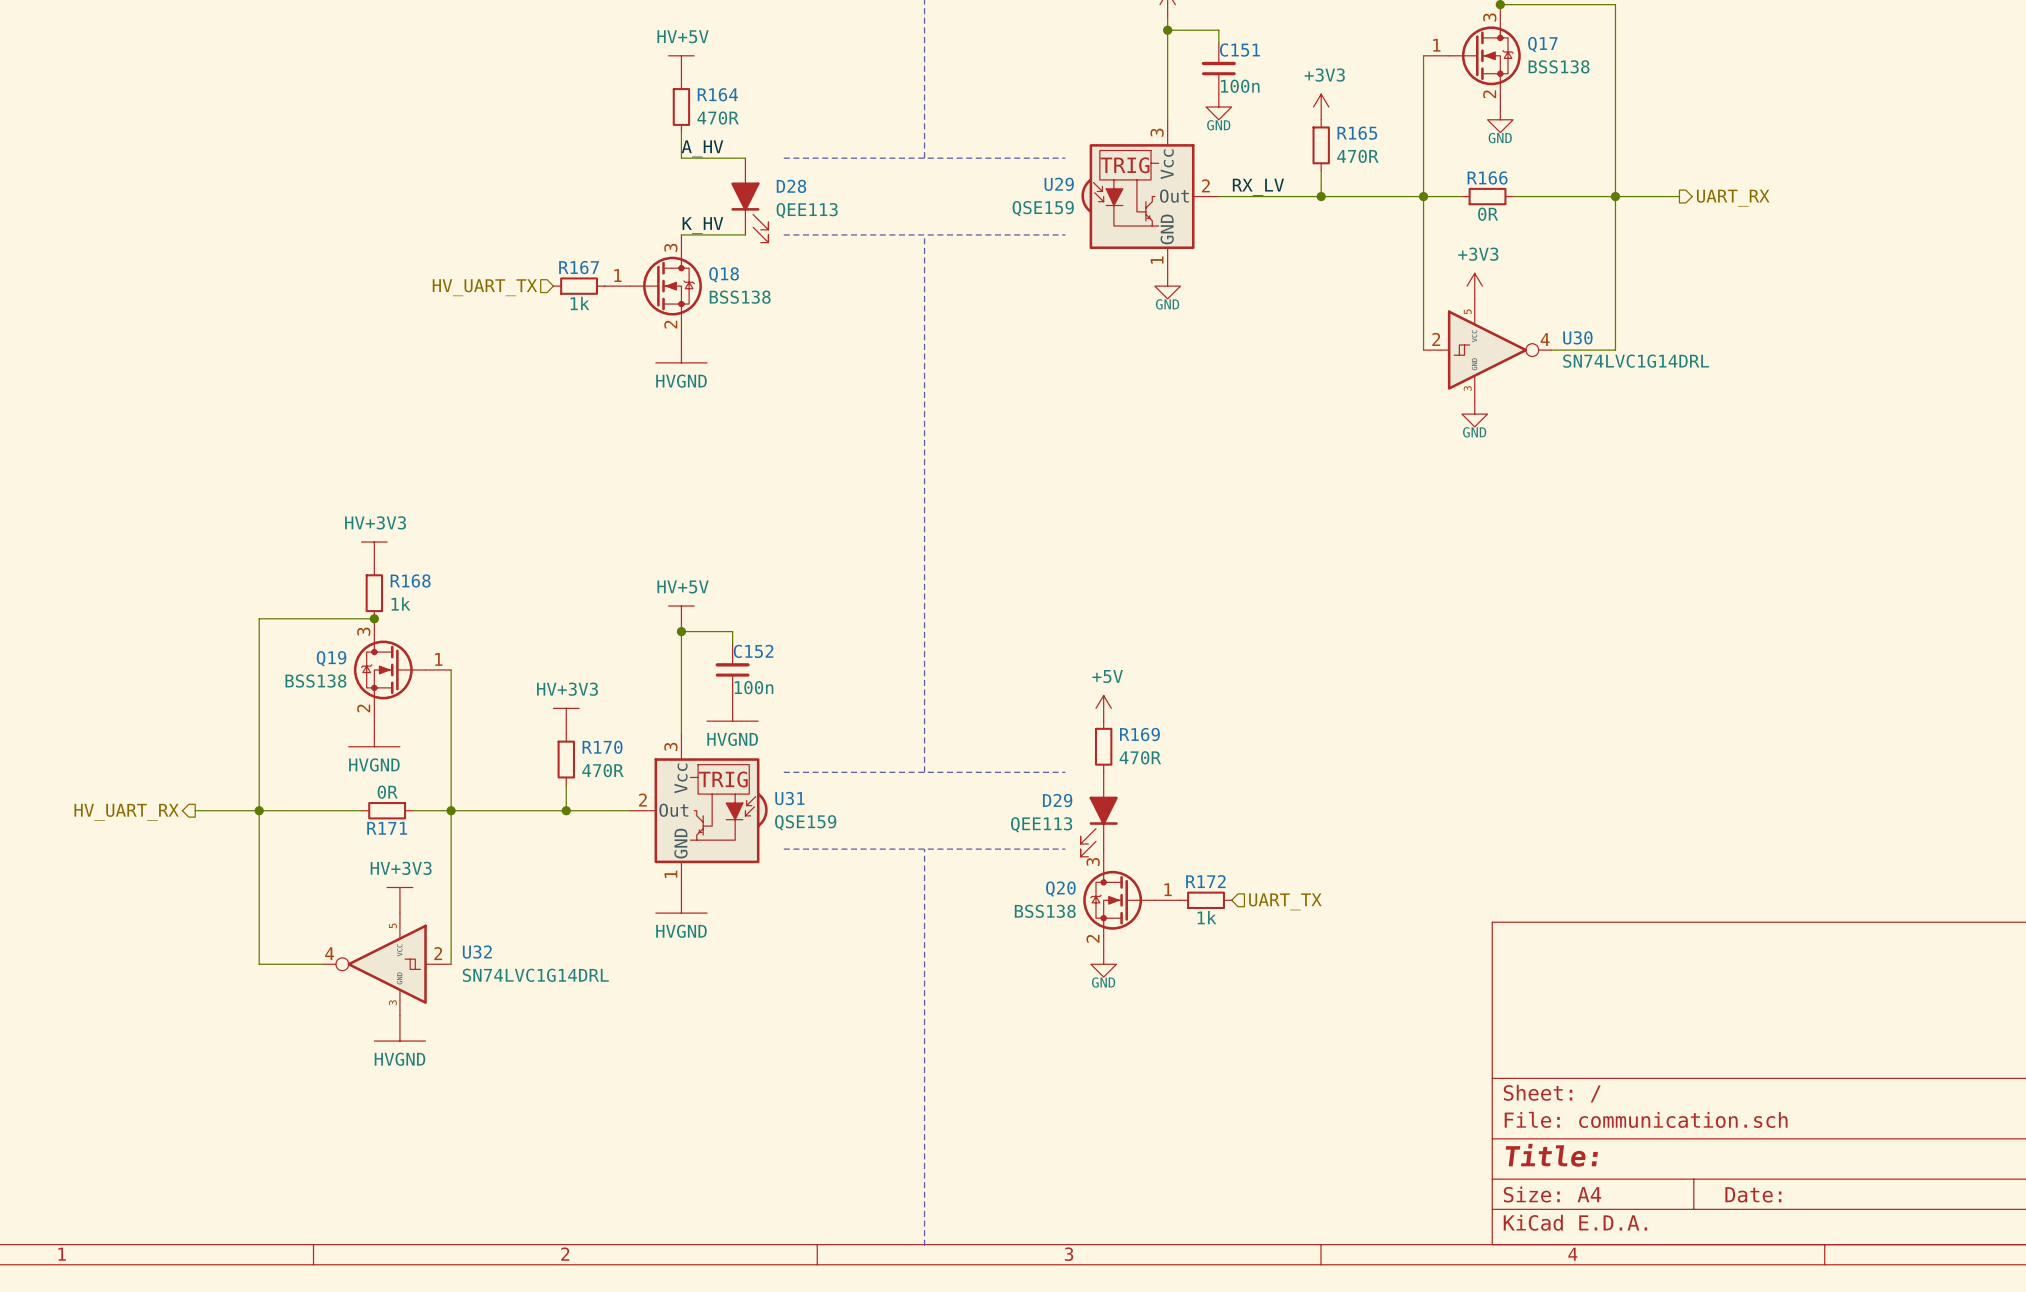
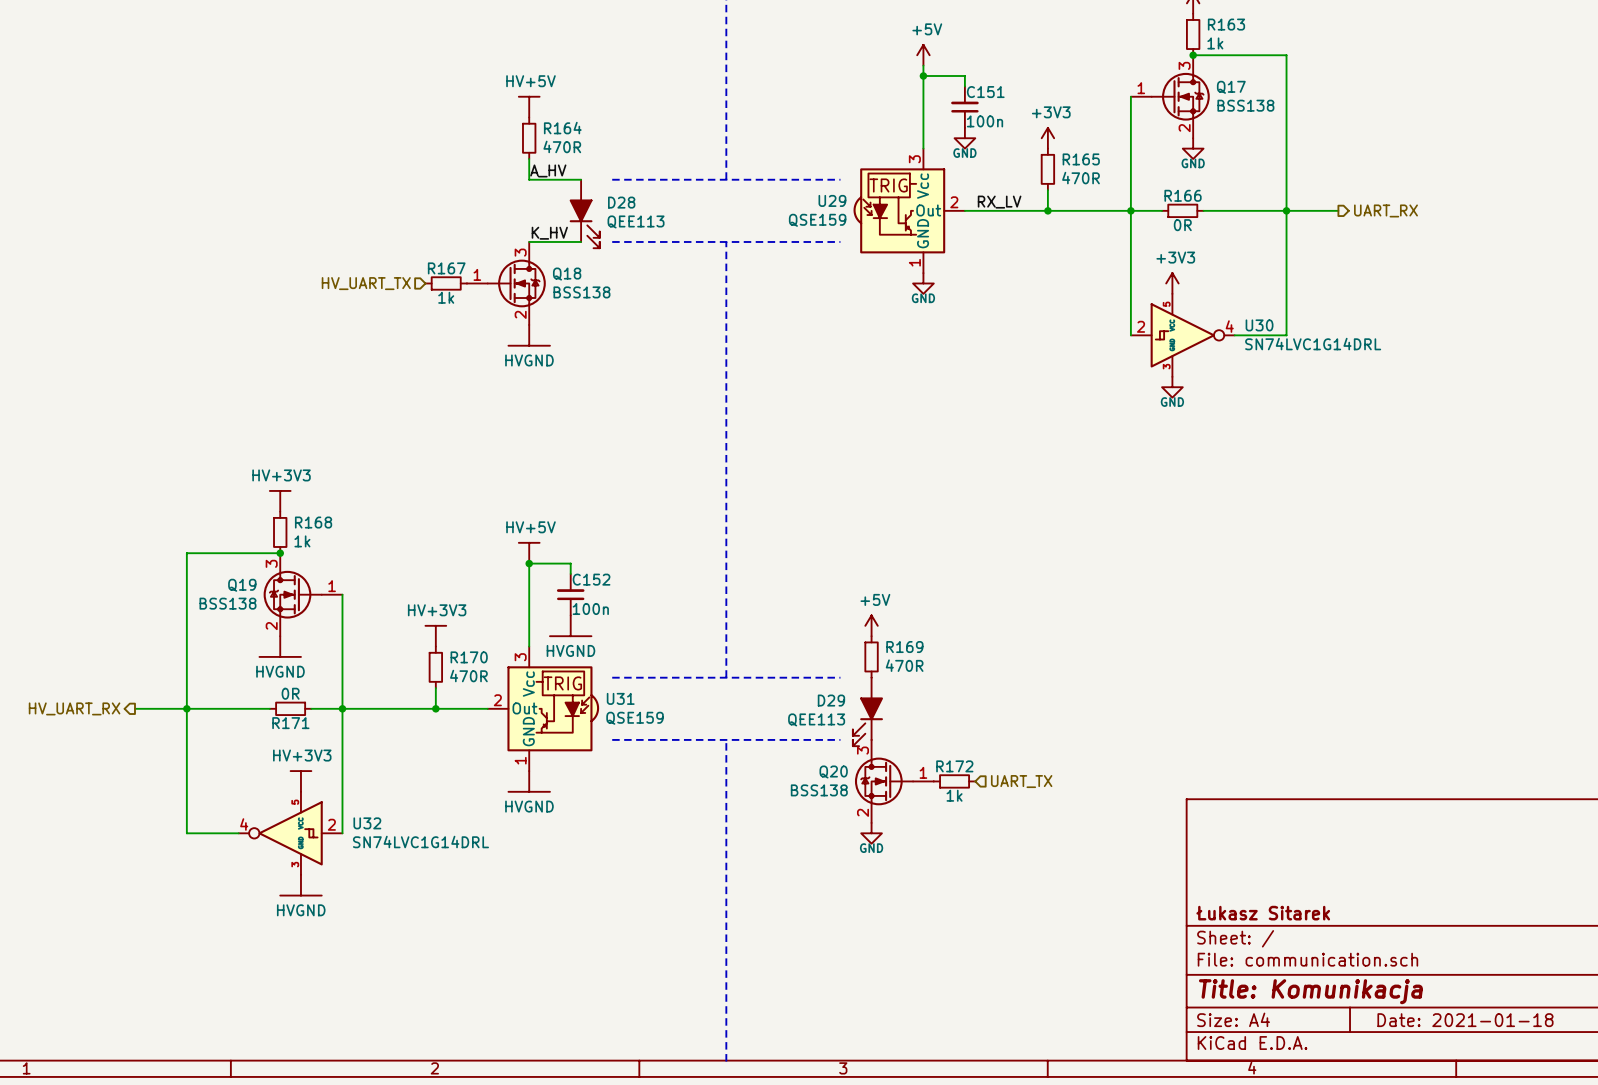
title block: none -> Łukasz Sitarek (1263, 913)
title block: Title: (1551, 1155) -> Title: Komunikacja (1310, 991)
title block: Date: (1753, 1194) -> Date: 2021-01-18 (1465, 1020)

